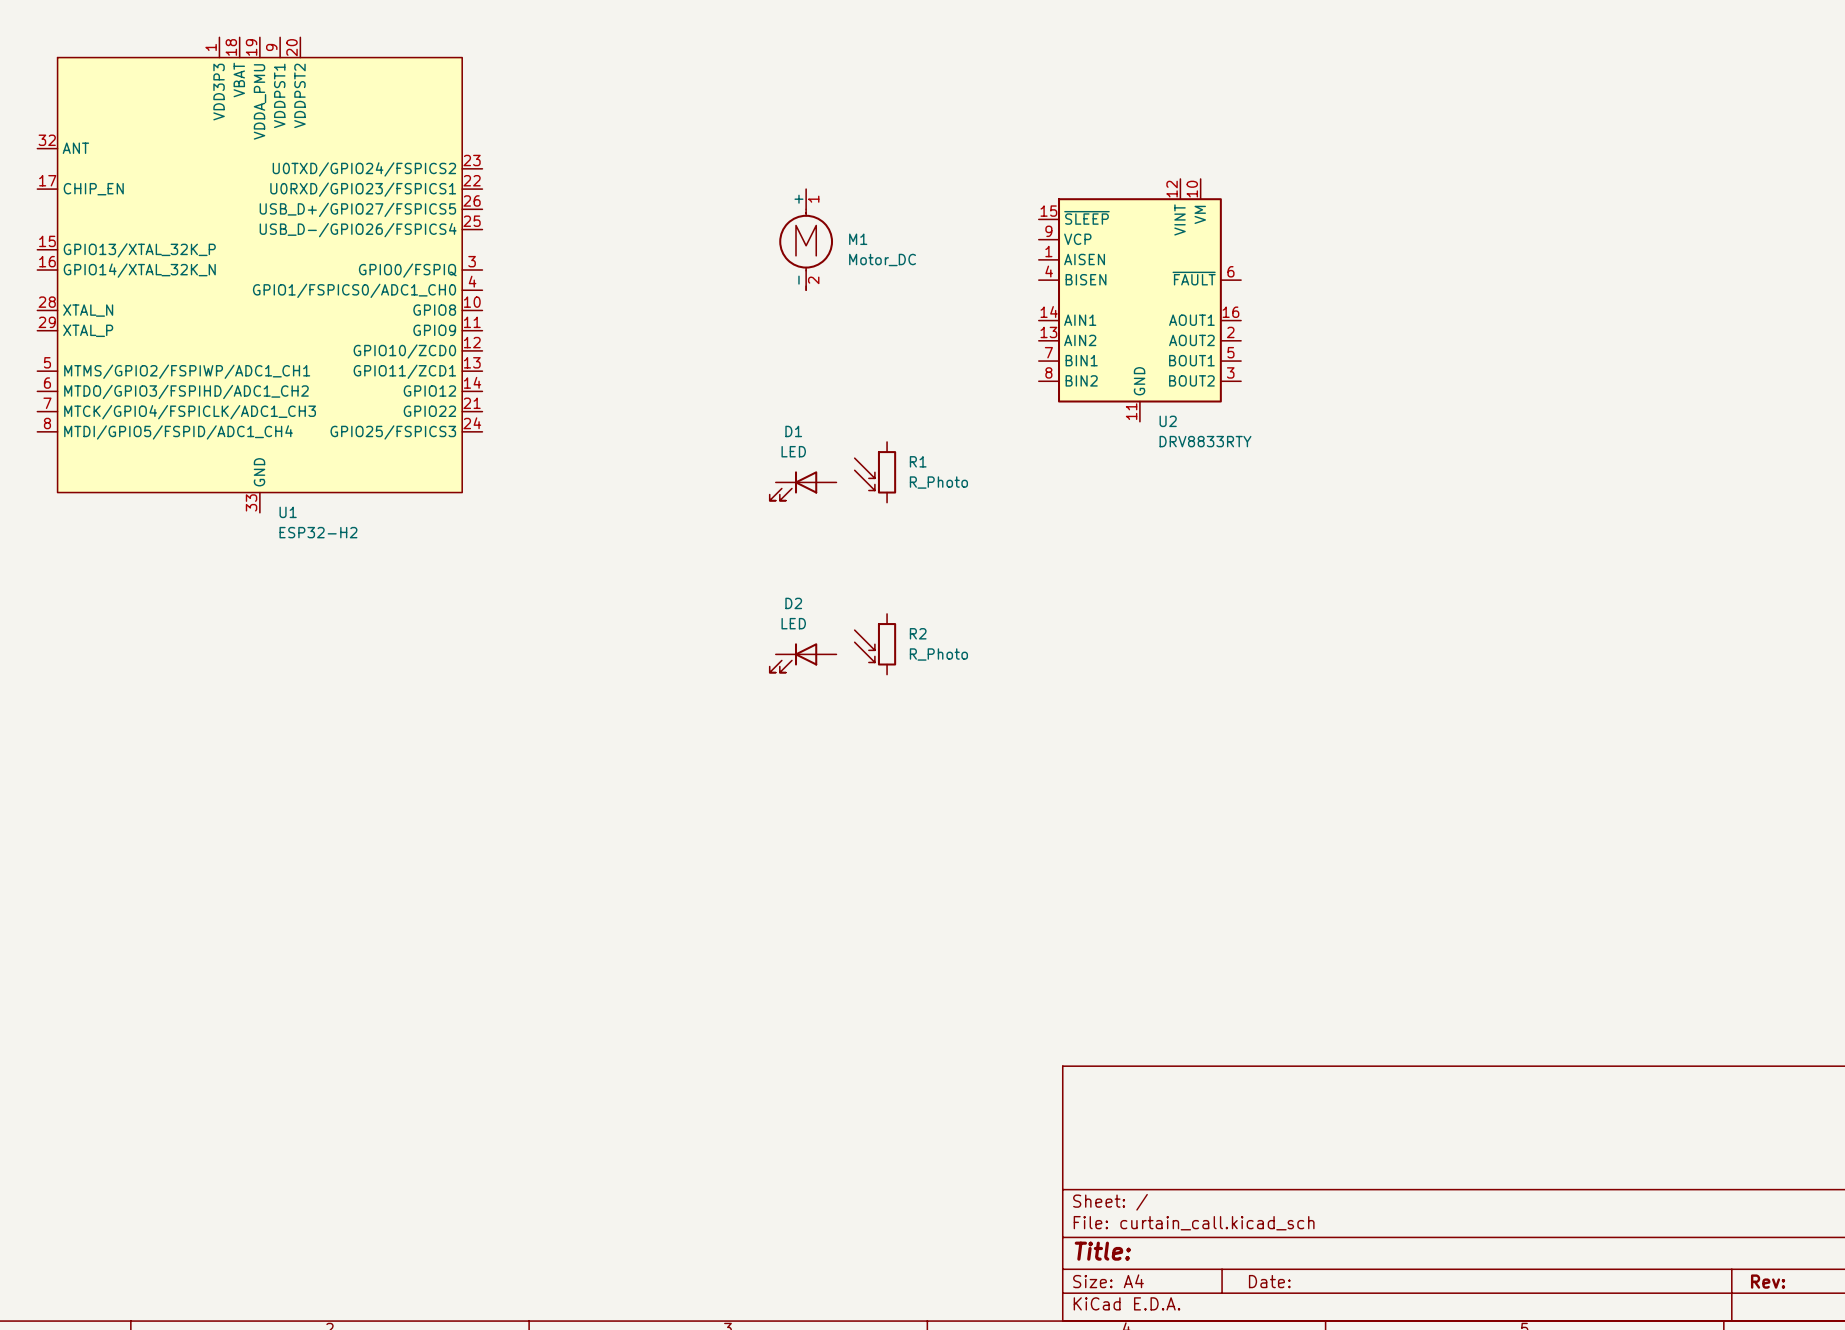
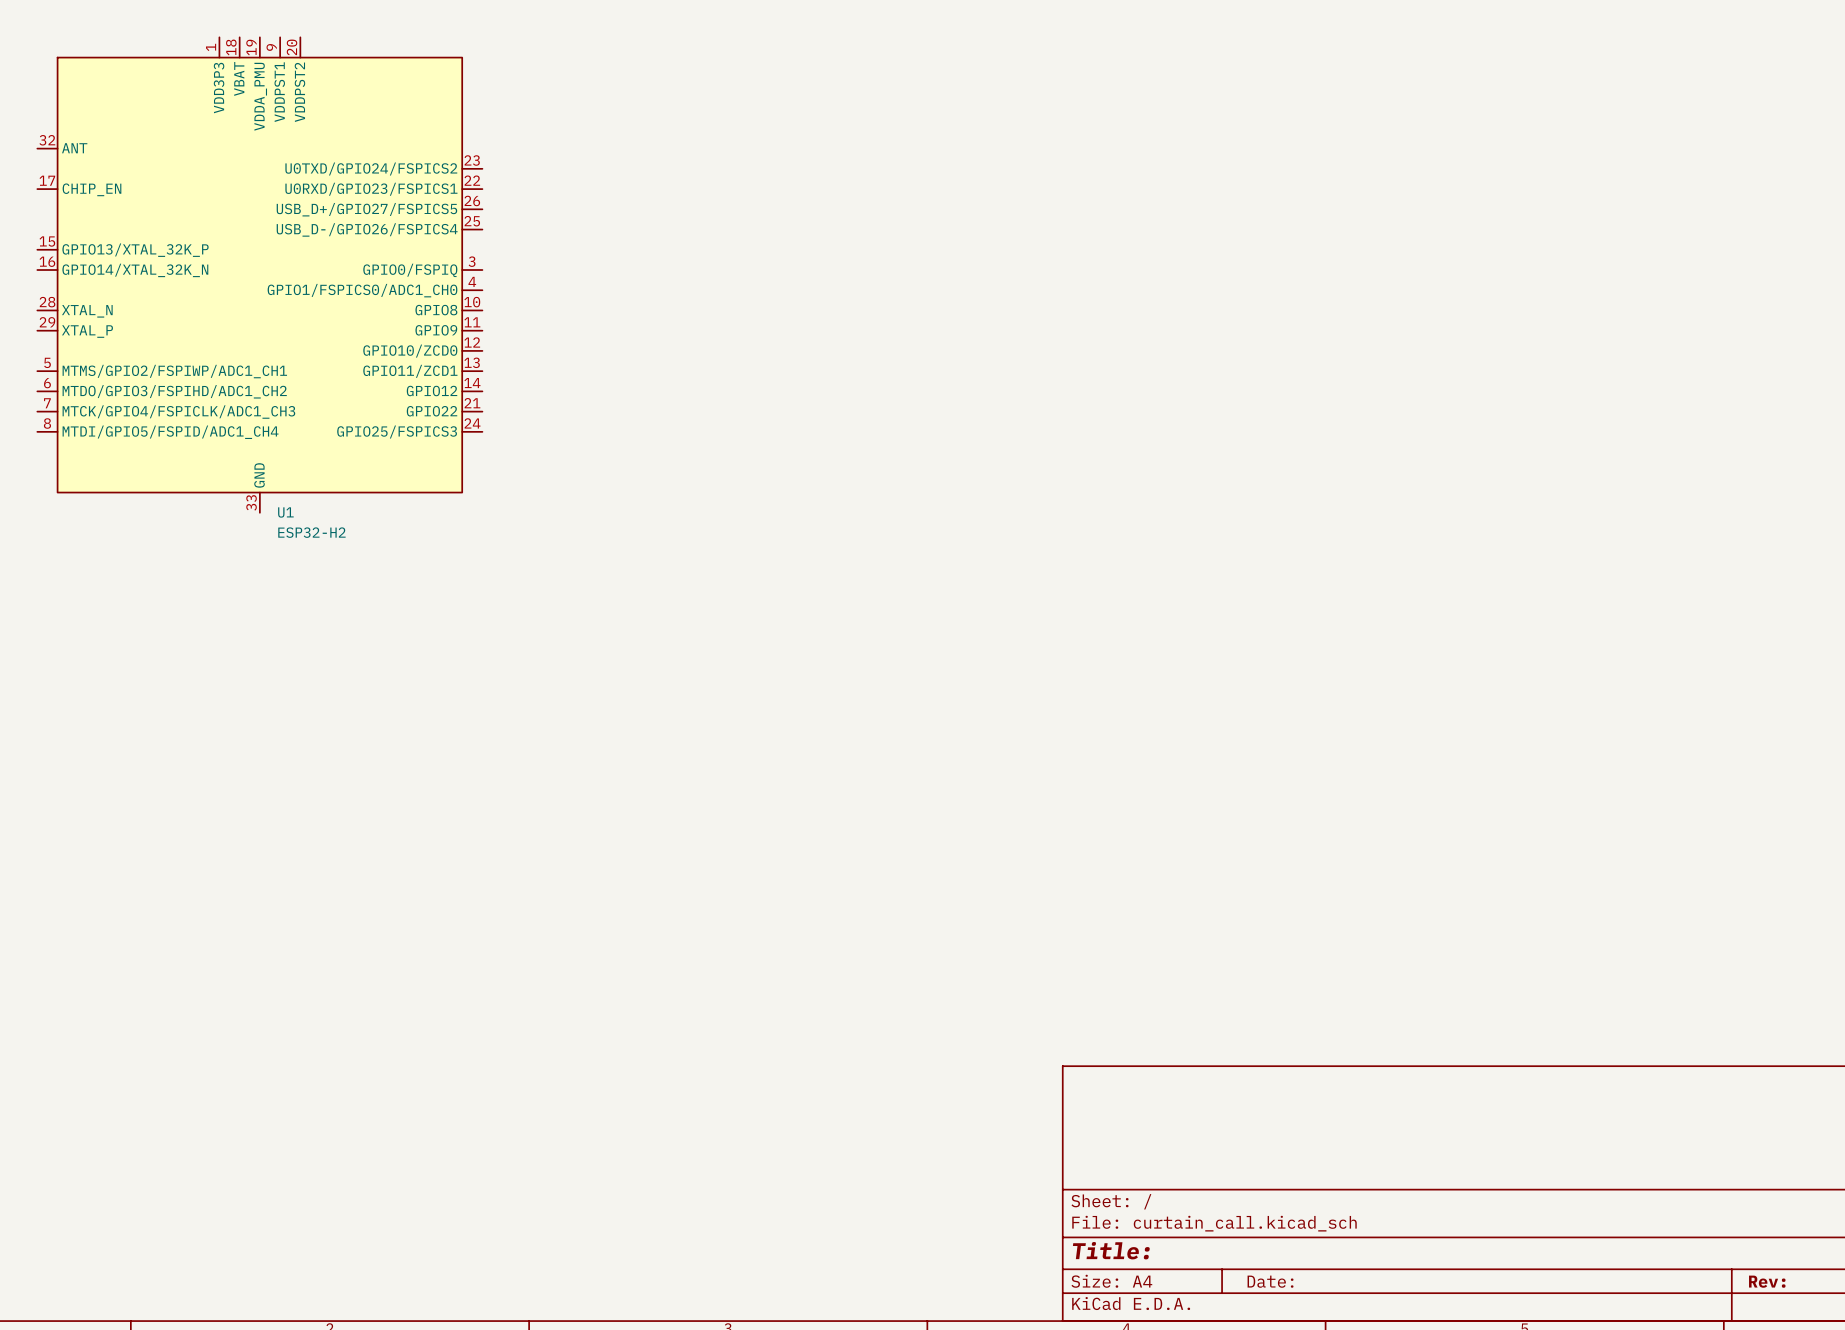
M1: Motor_DC (806, 239) -> none
U2: DRV8833RTY (1139, 300) -> none
R1: R_Photo (875, 472) -> none
D1: LED (803, 485) -> none
R2: R_Photo (875, 644) -> none
D2: LED (803, 657) -> none

